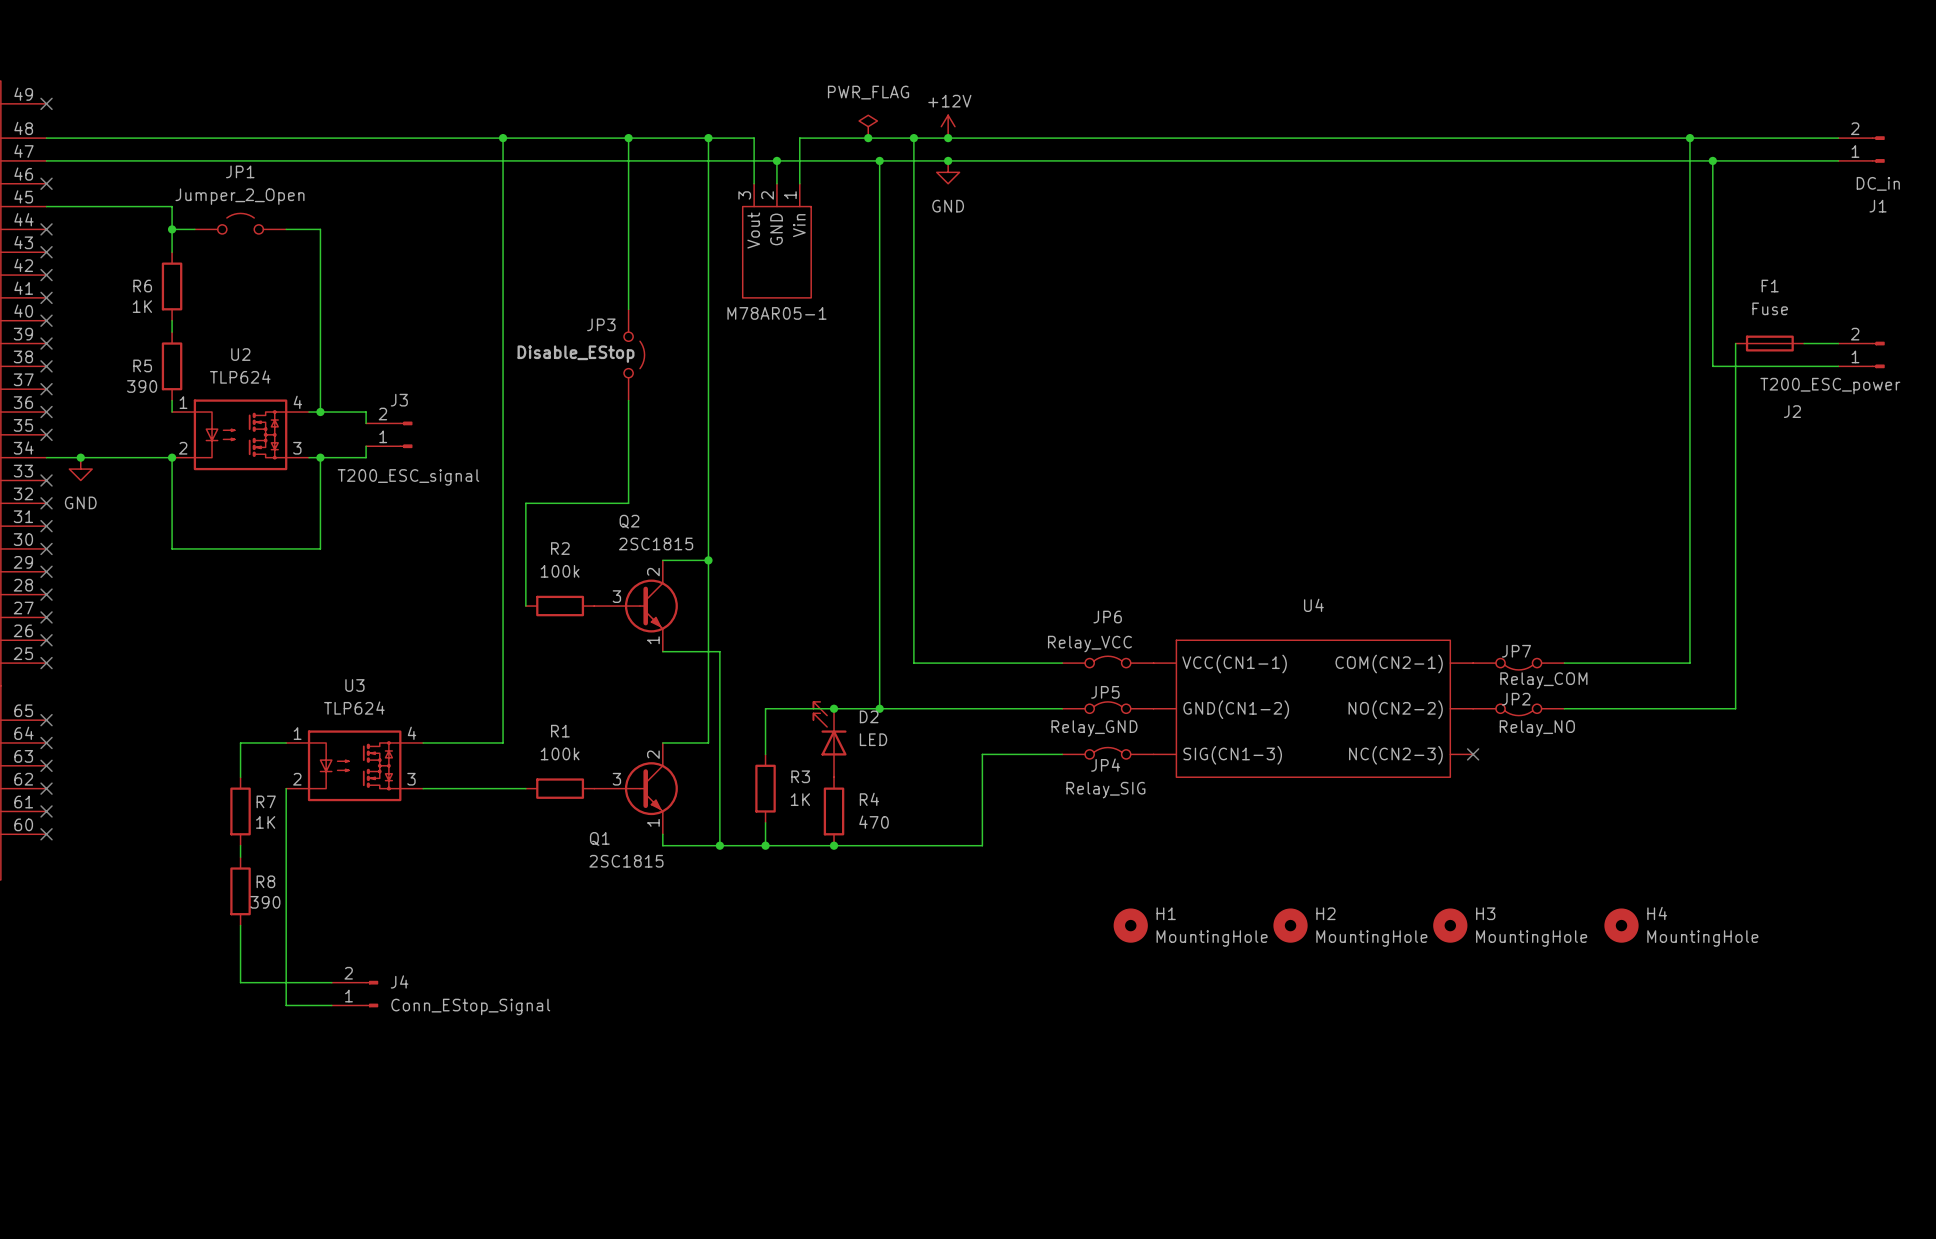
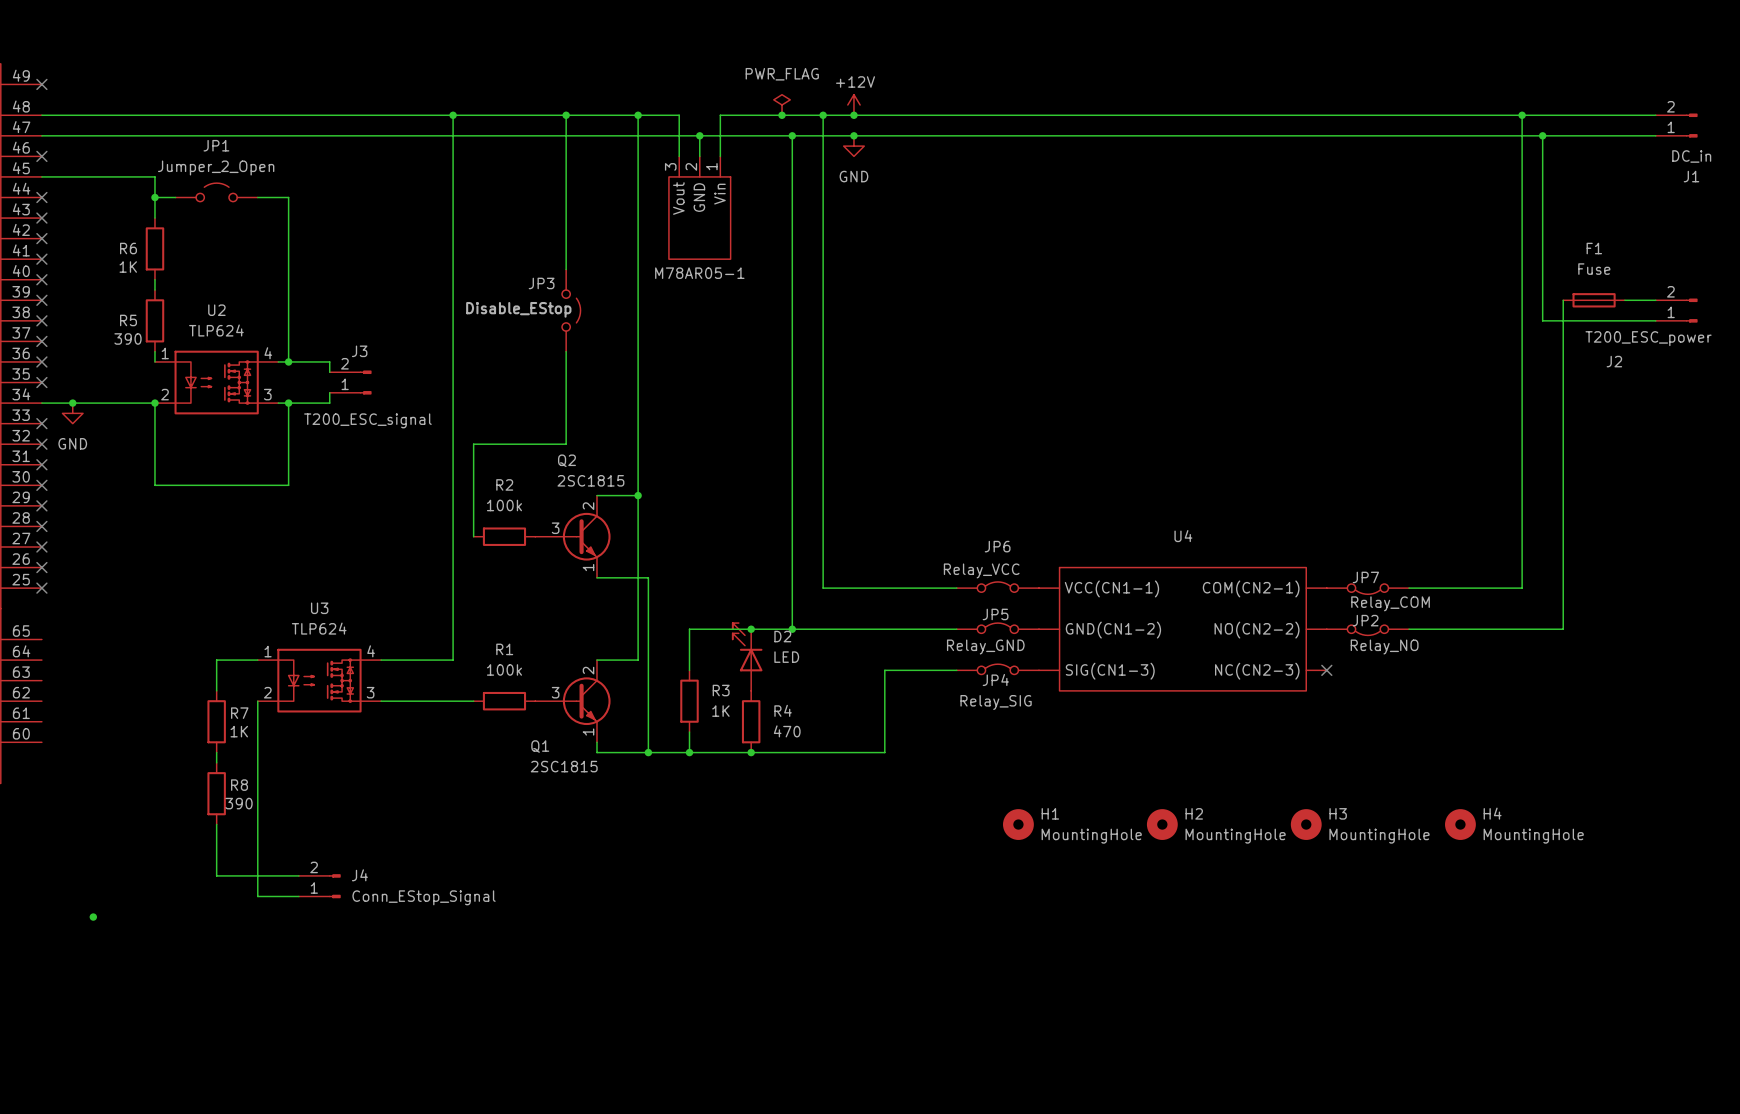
no-connect mark: (46, 720) -> none
no-connect mark: (46, 742) -> none
no-connect mark: (46, 765) -> none
no-connect mark: (46, 788) -> none
no-connect mark: (46, 811) -> none
no-connect mark: (46, 834) -> none
junction: none -> (93, 917)

